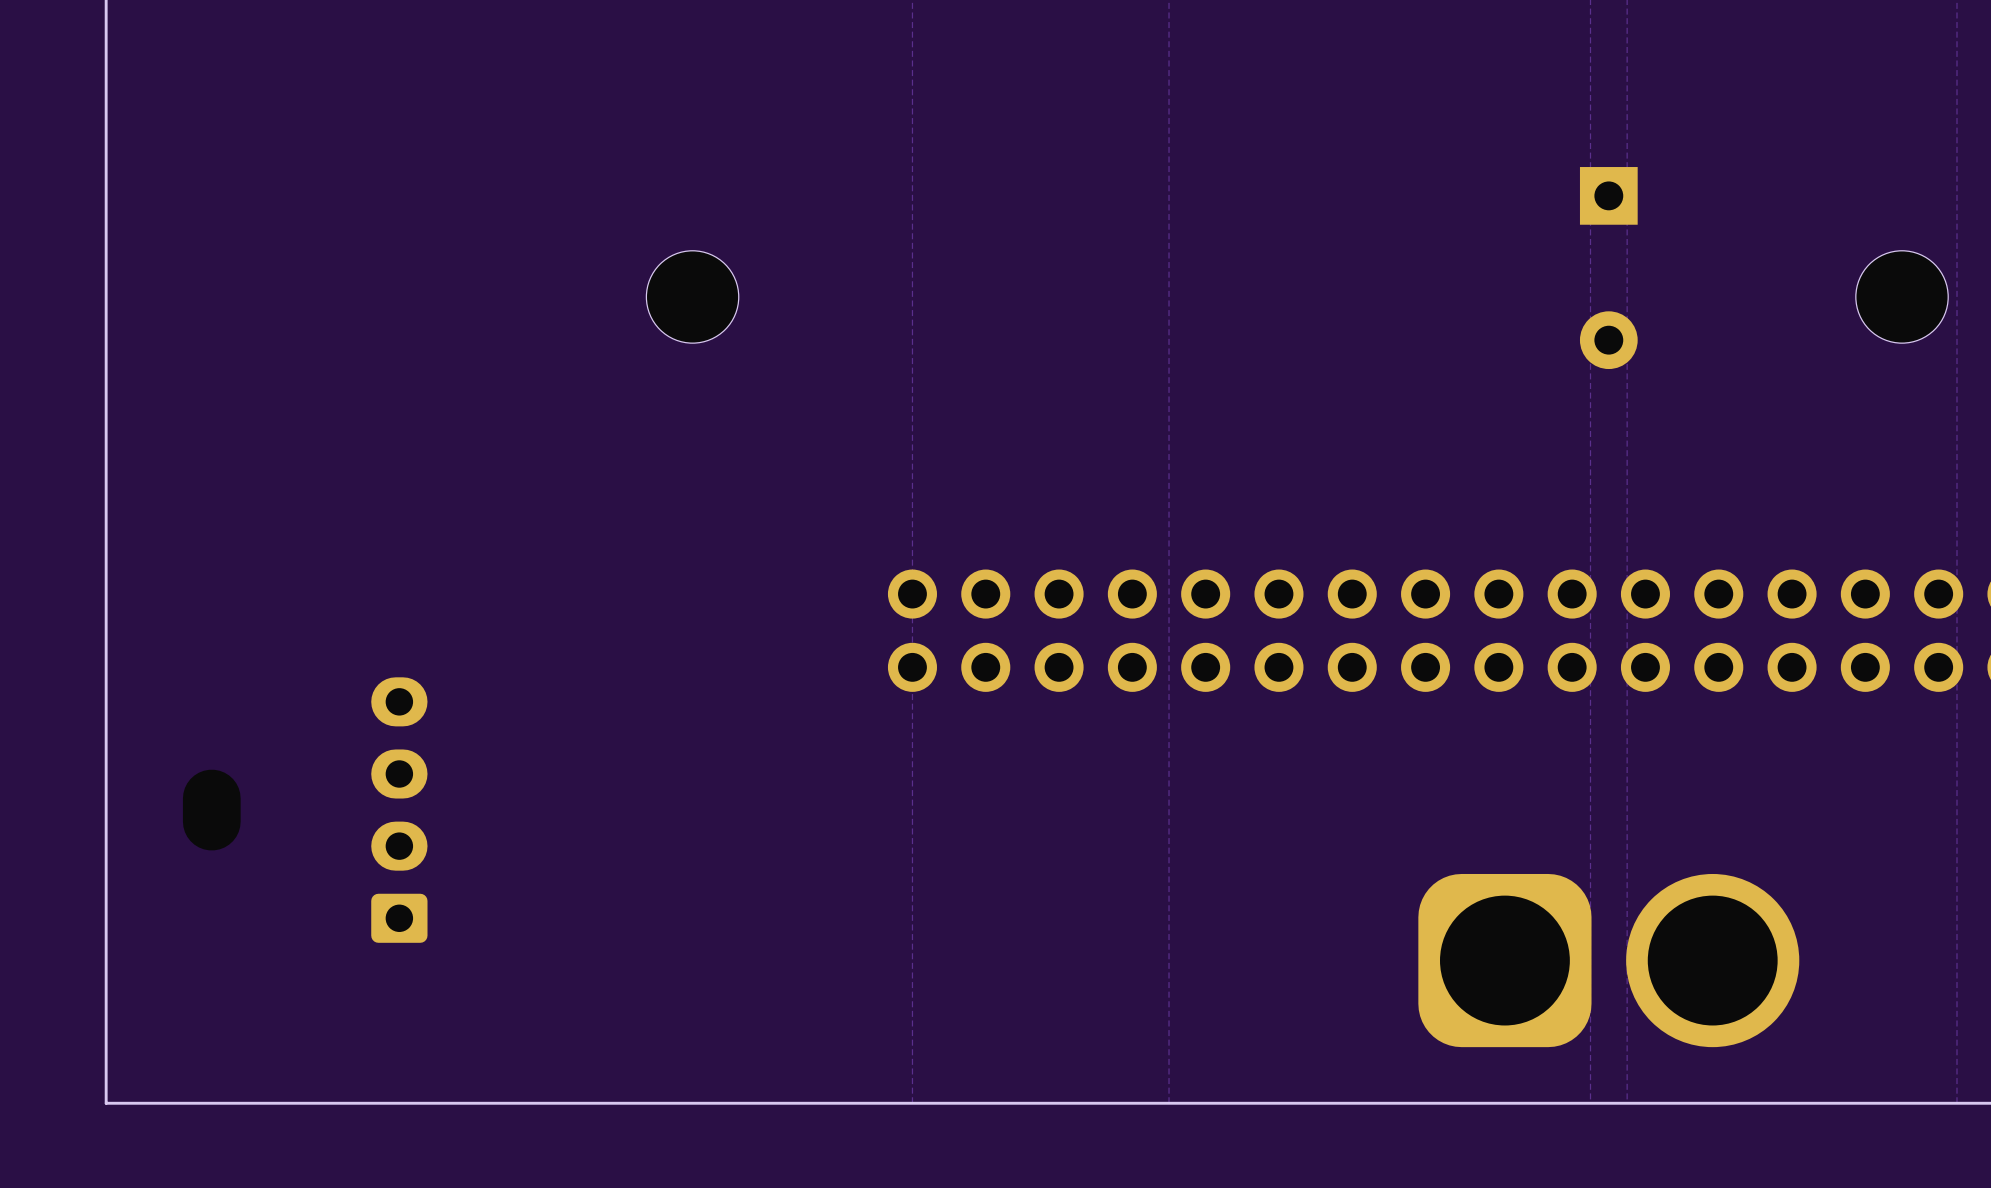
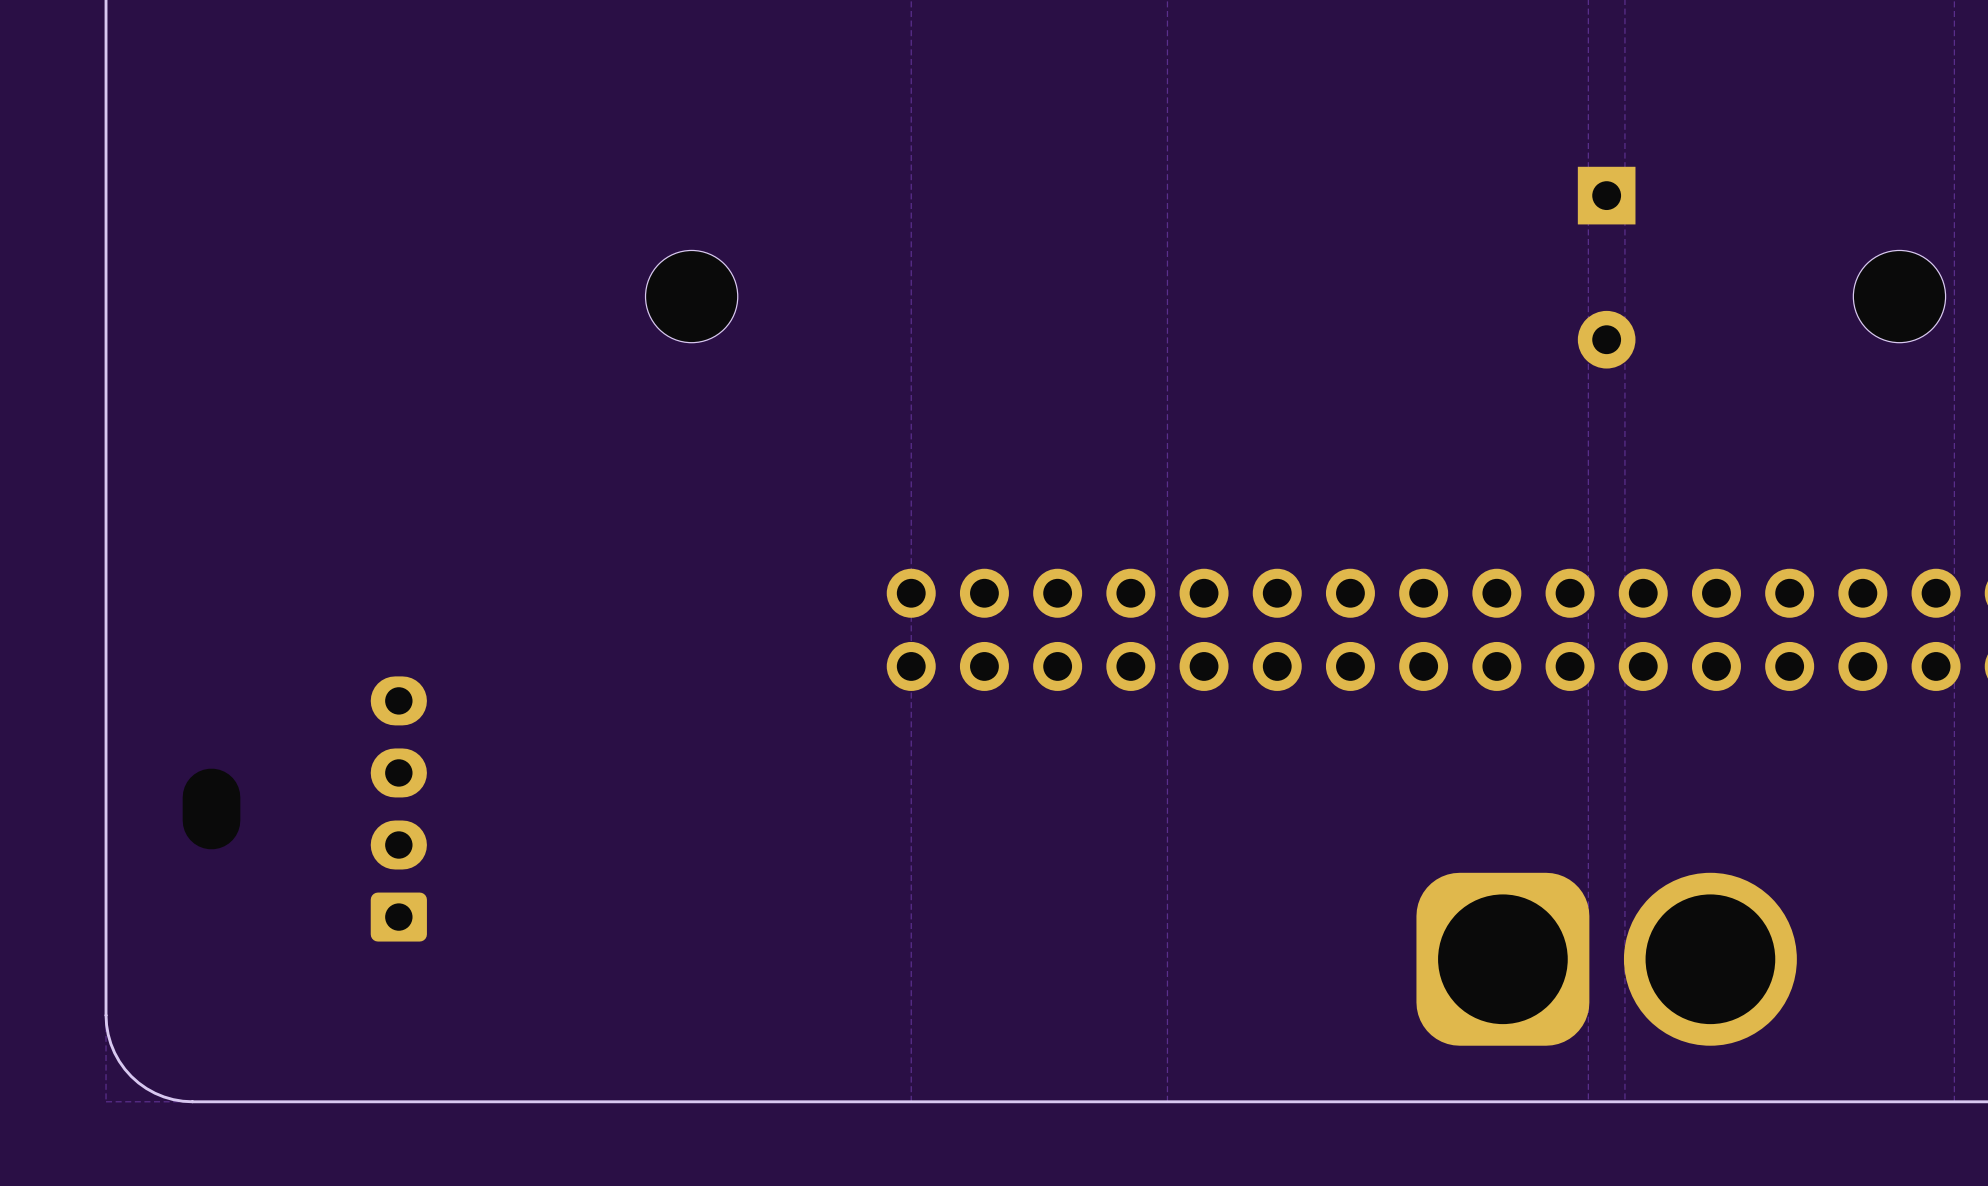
board edge: (106, 1016) (106, 1103) (192, 1103) -> (106, 1015) (110, 1043) (119, 1061) (131, 1076) (154, 1093) (173, 1099) (192, 1101)

